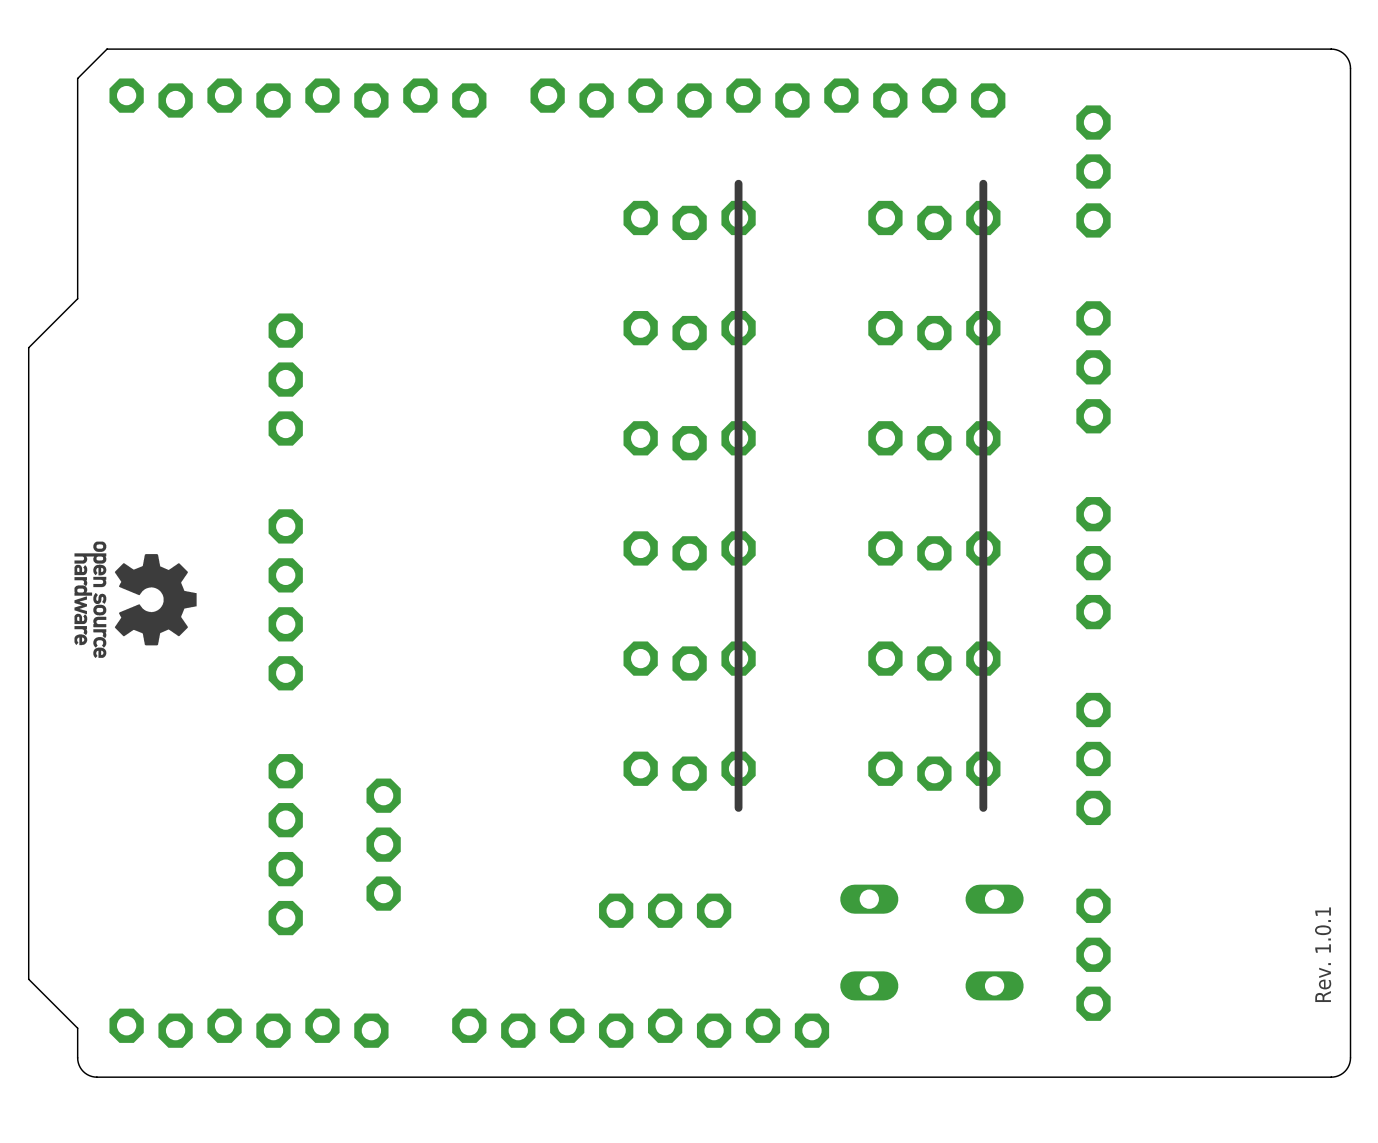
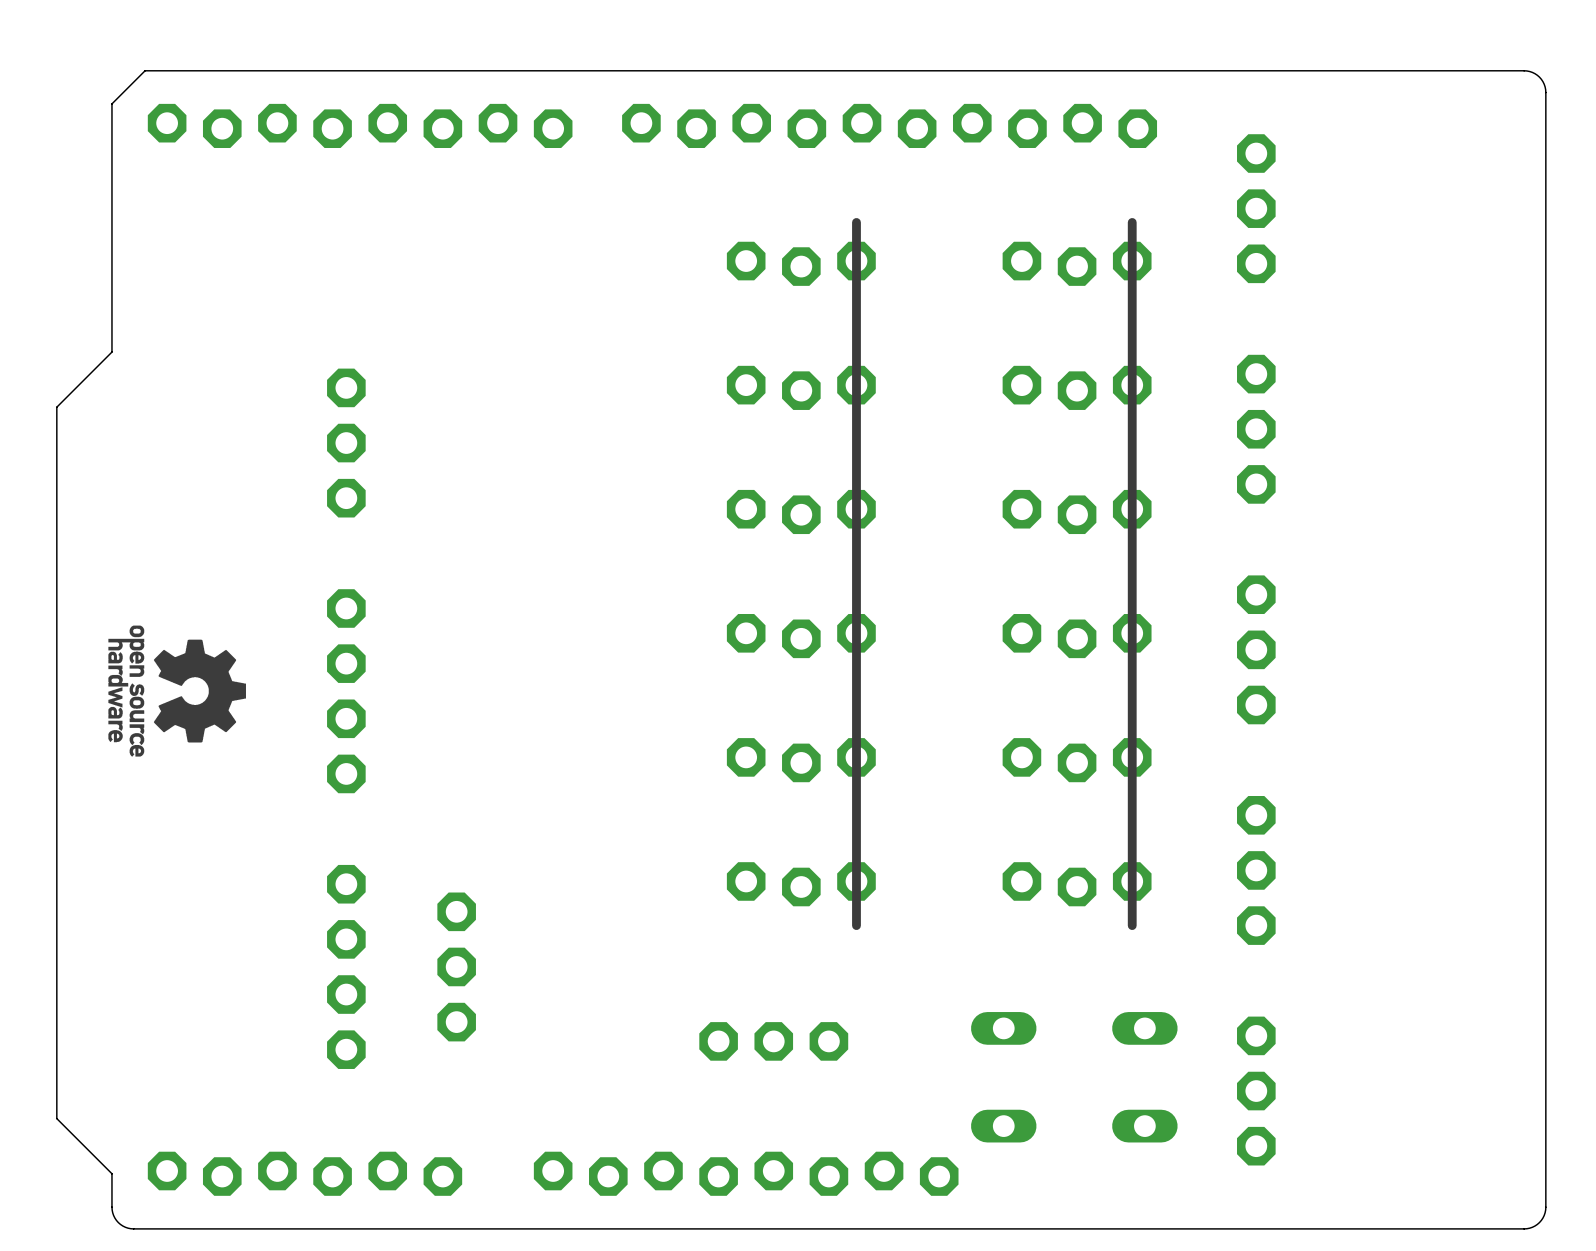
text: Rev. 1.0.1 (1323, 954) -> none

